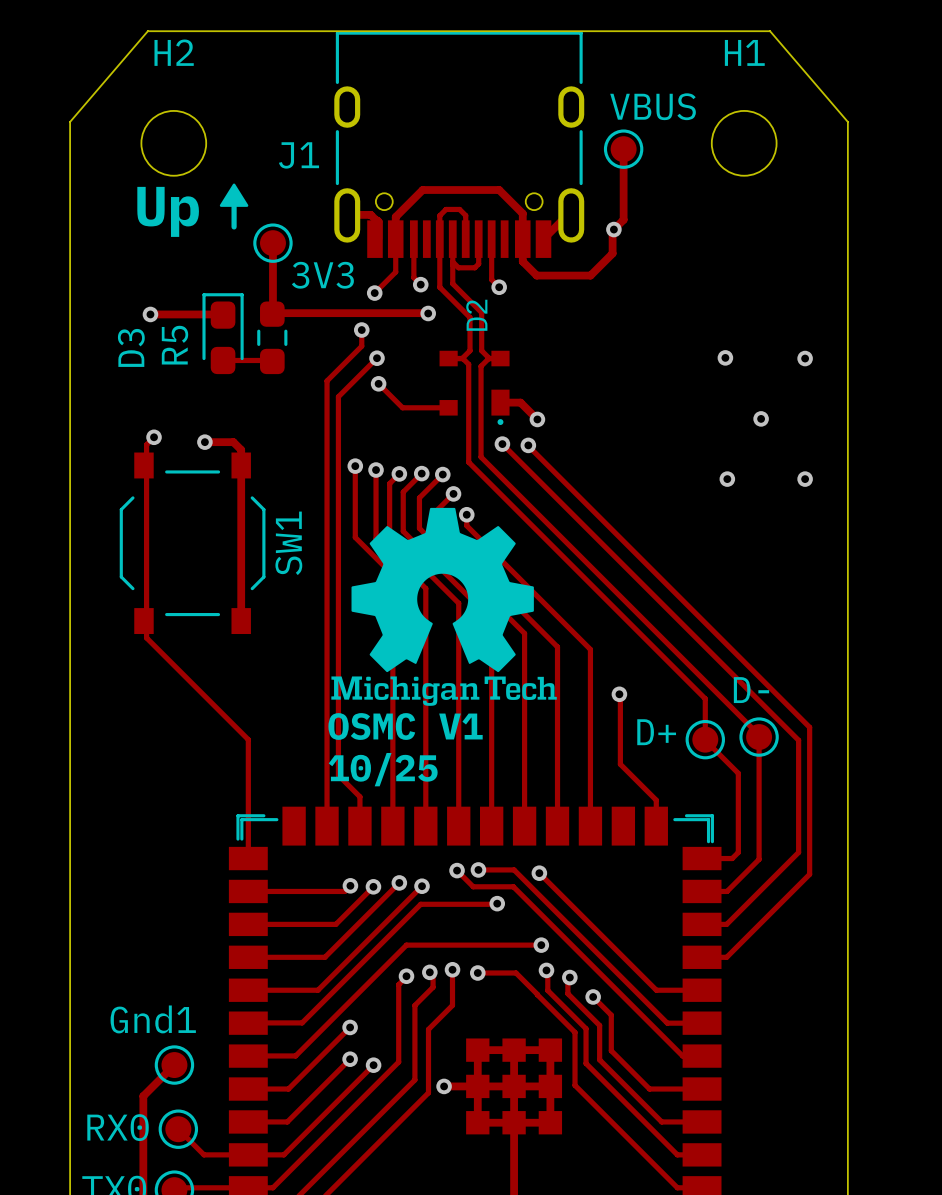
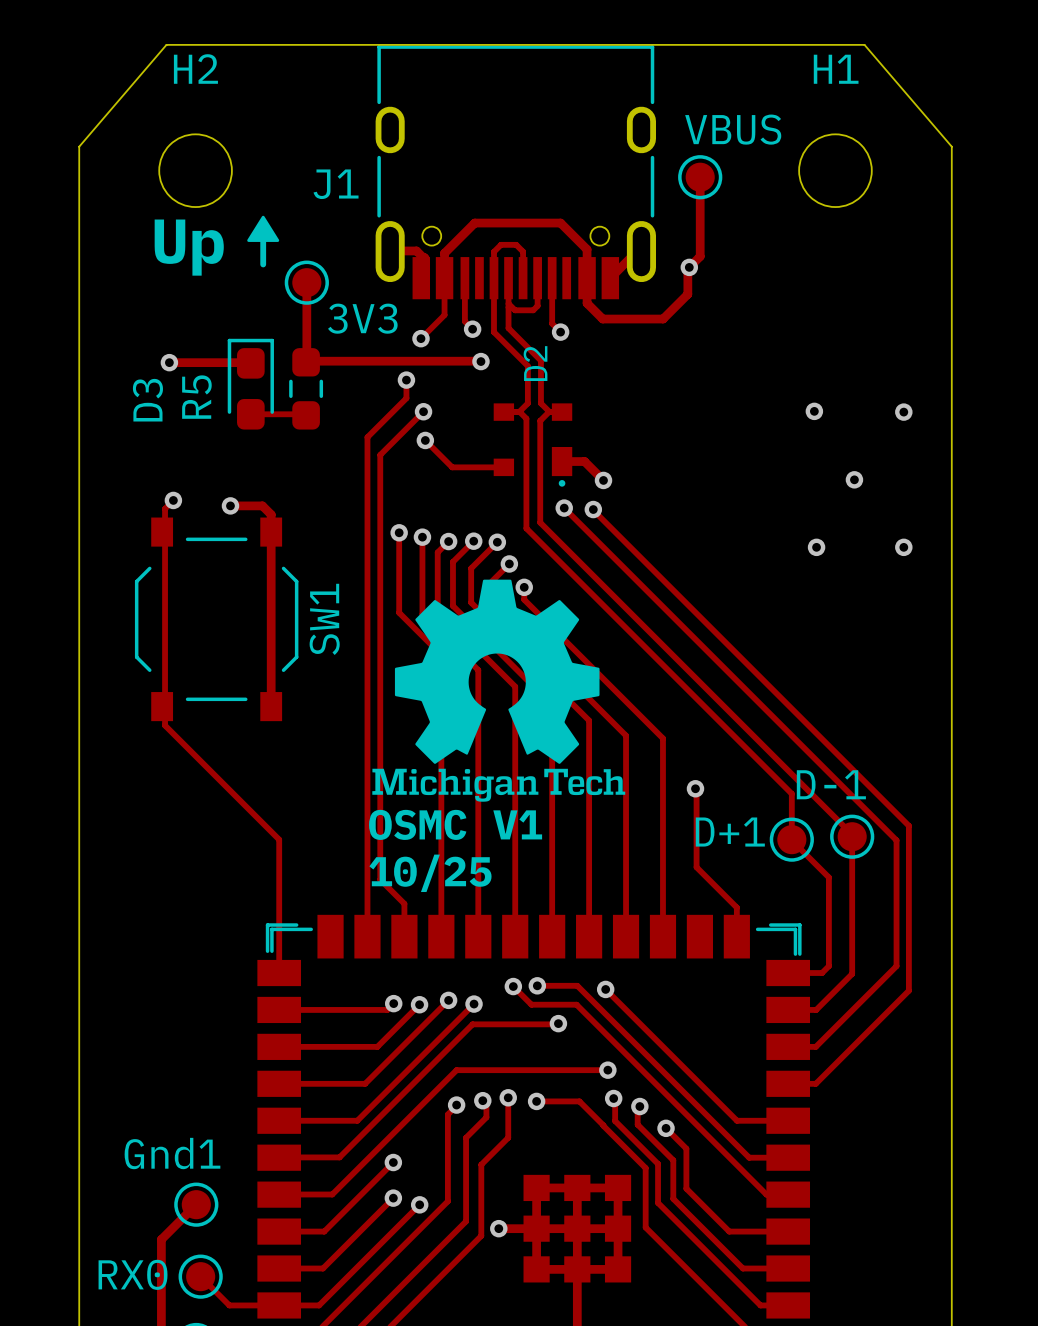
D- name: D- (751, 690) -> D-1 (831, 784)
D+ name: D+ (656, 732) -> D+1 (730, 832)

